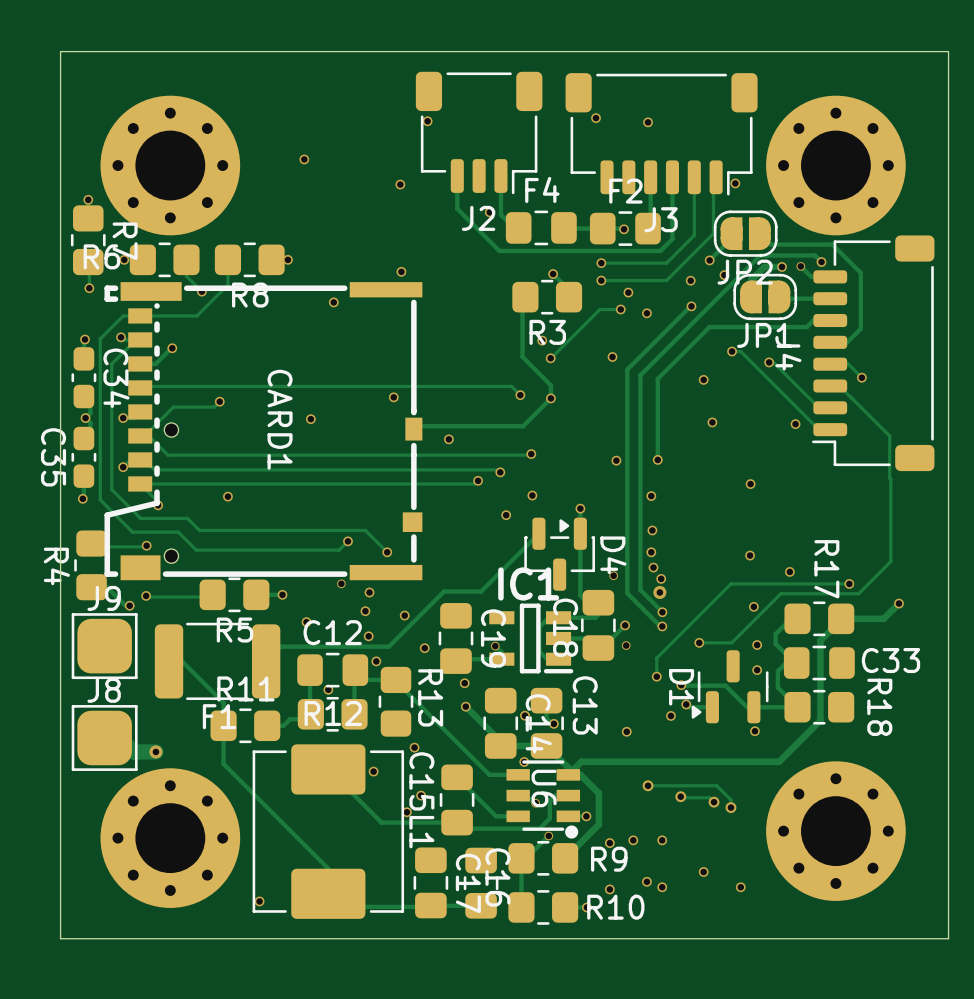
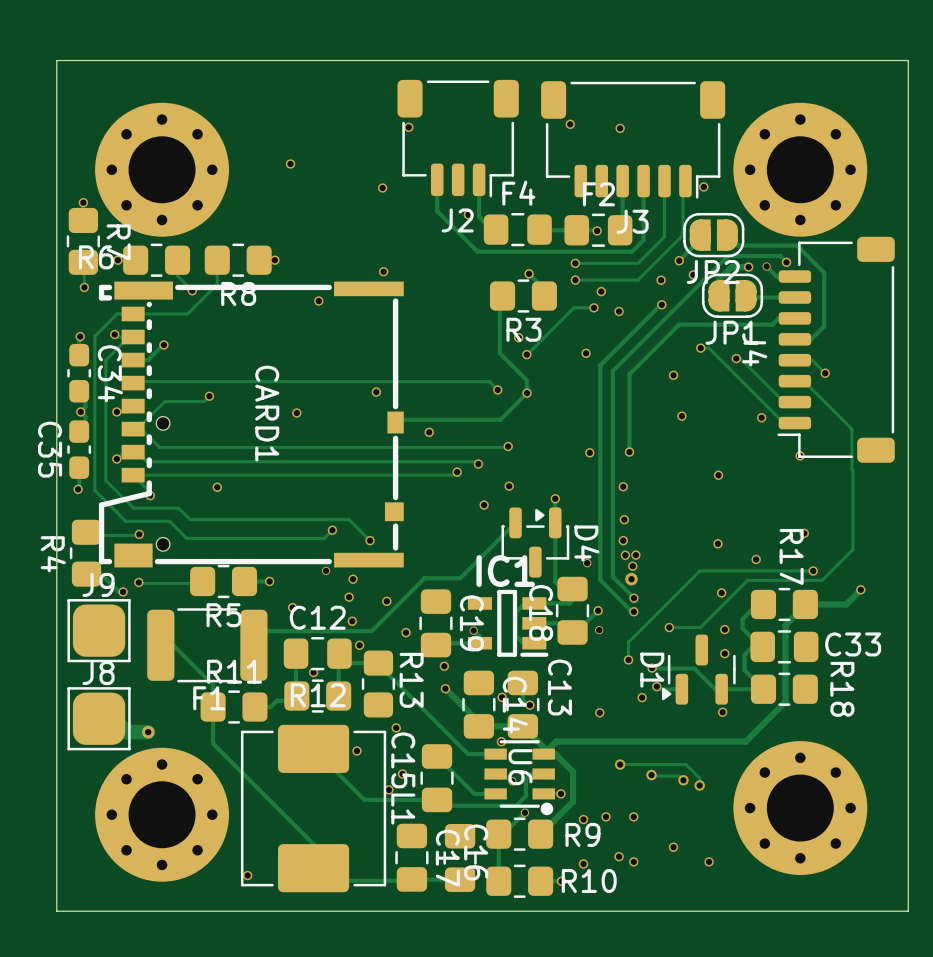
via: none -> (800, 455)
via: none -> (804, 533)
via: none -> (635, 555)

